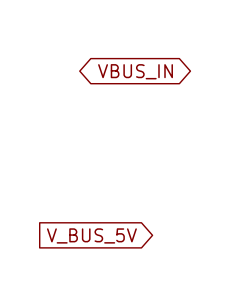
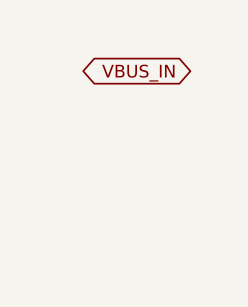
global label: V_BUS_5V (91, 235) -> none

